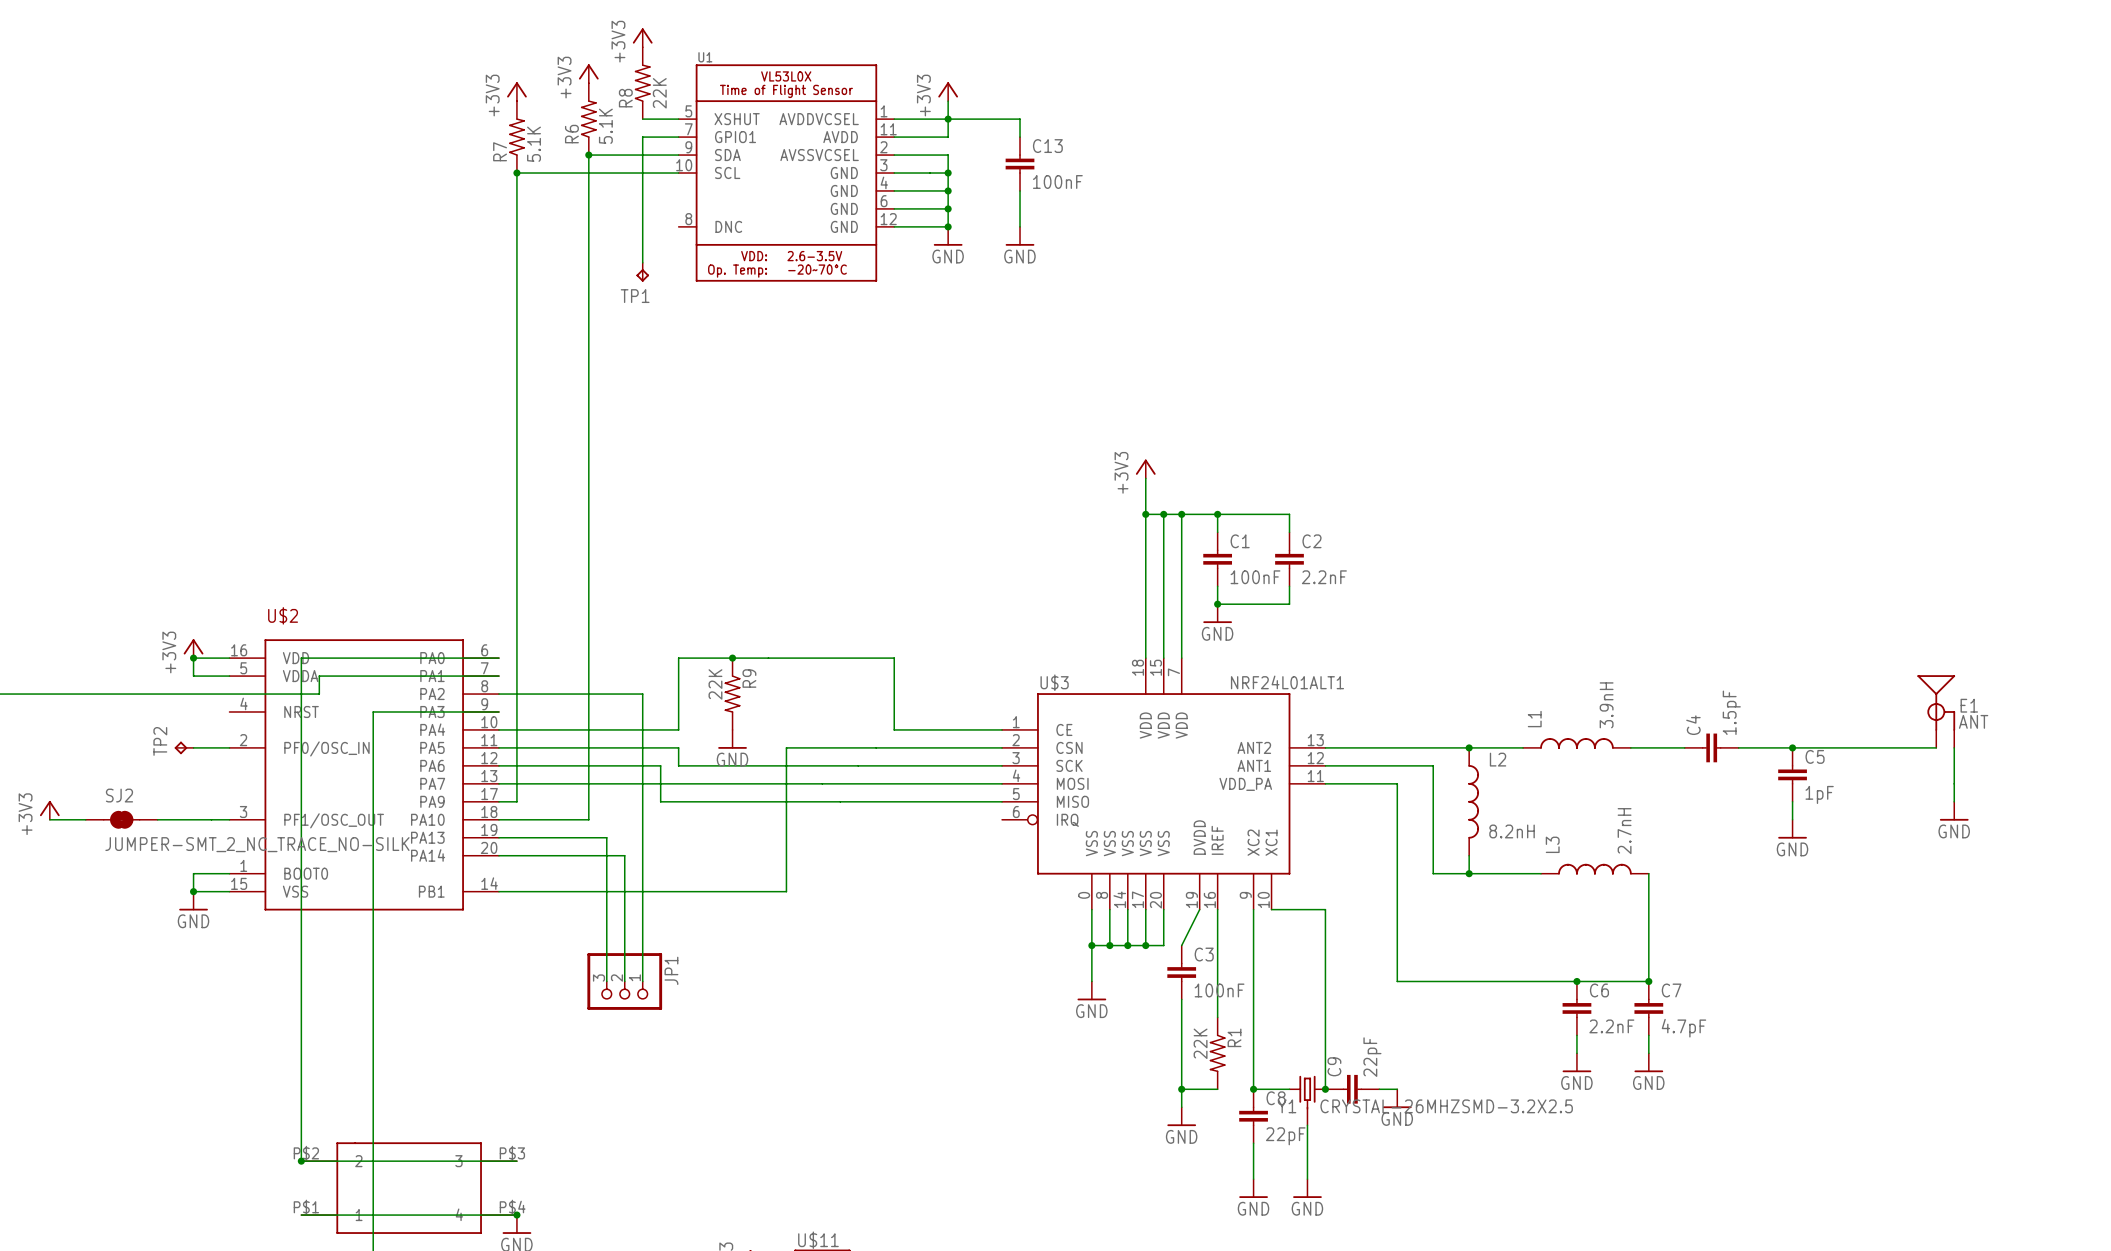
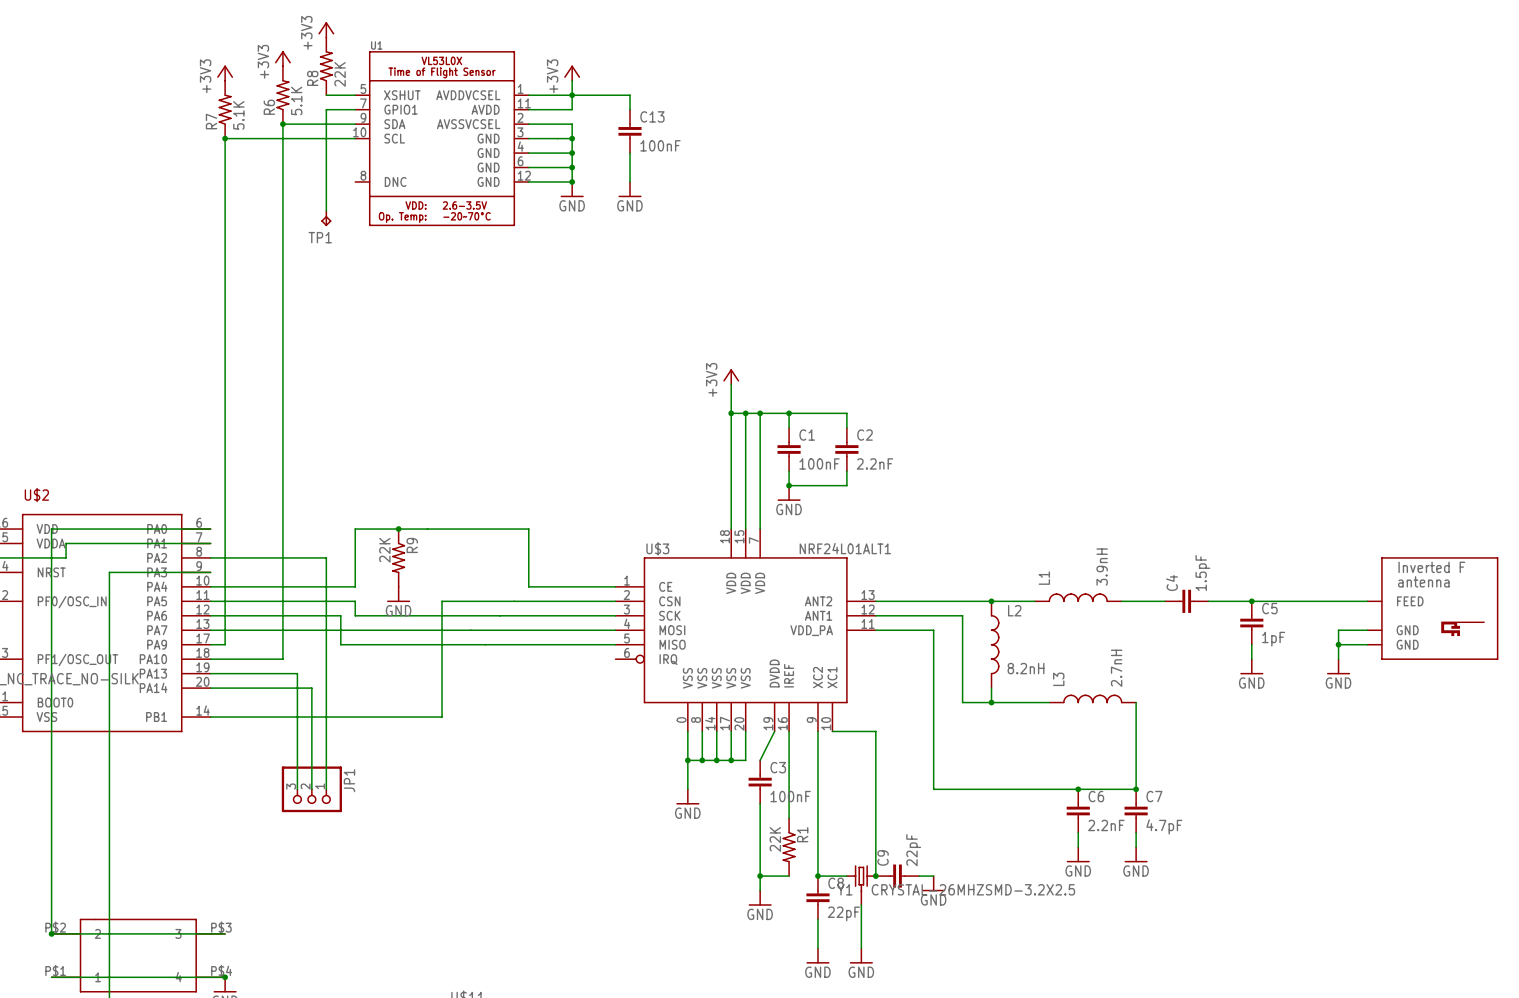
E1: ANT (1936, 711) -> none
part: none -> (1432, 608)
wire: none -> (1367, 630) (1338, 630) (1338, 659)
wire: none -> (1338, 644) (1367, 644)
junction: none -> (1338, 644)
power symbol position: GND (1954, 811) -> GND (1338, 666)

